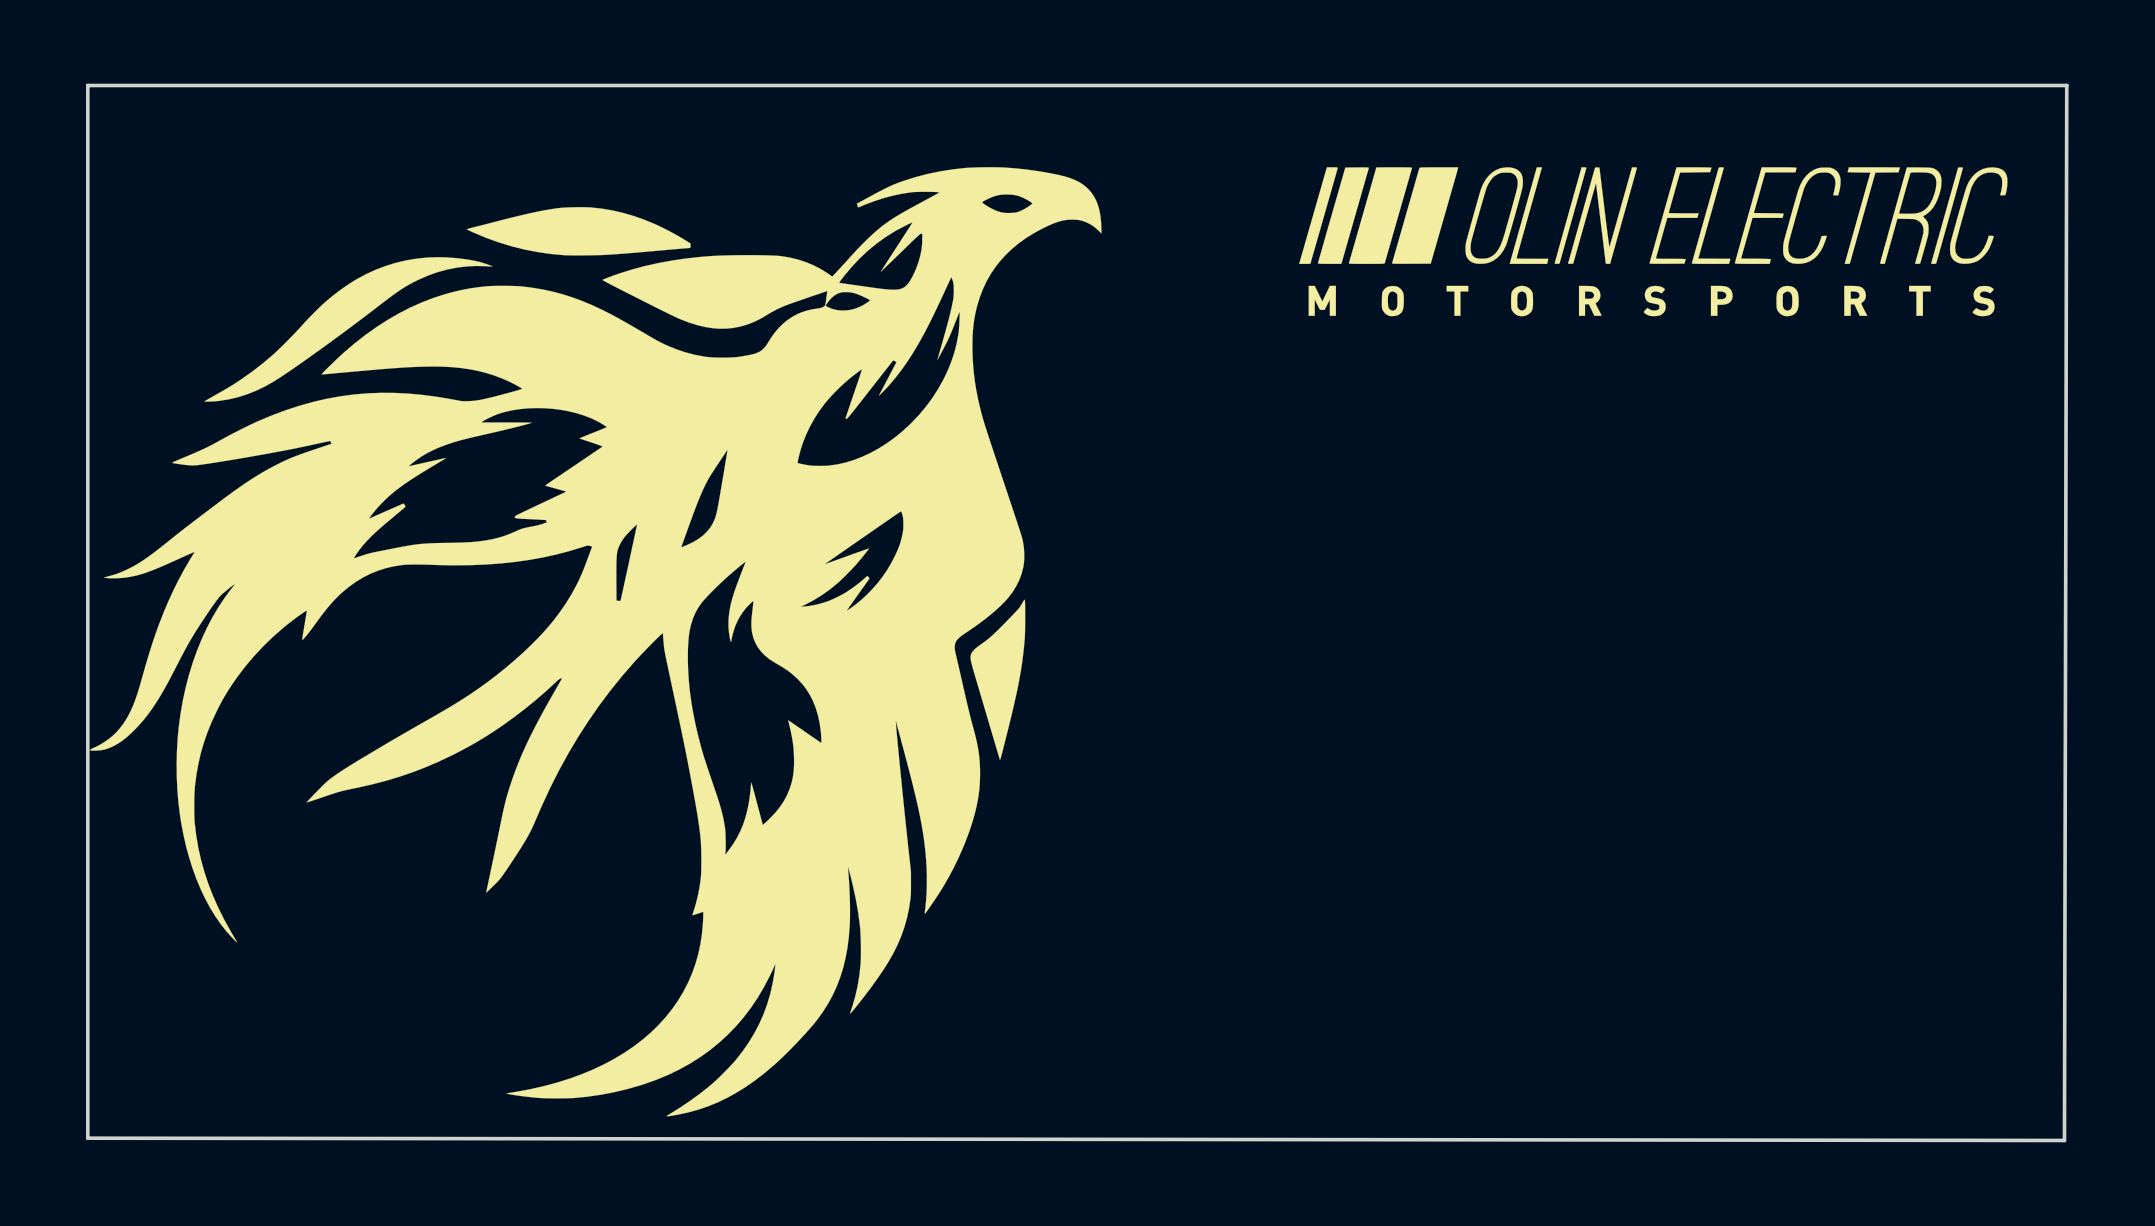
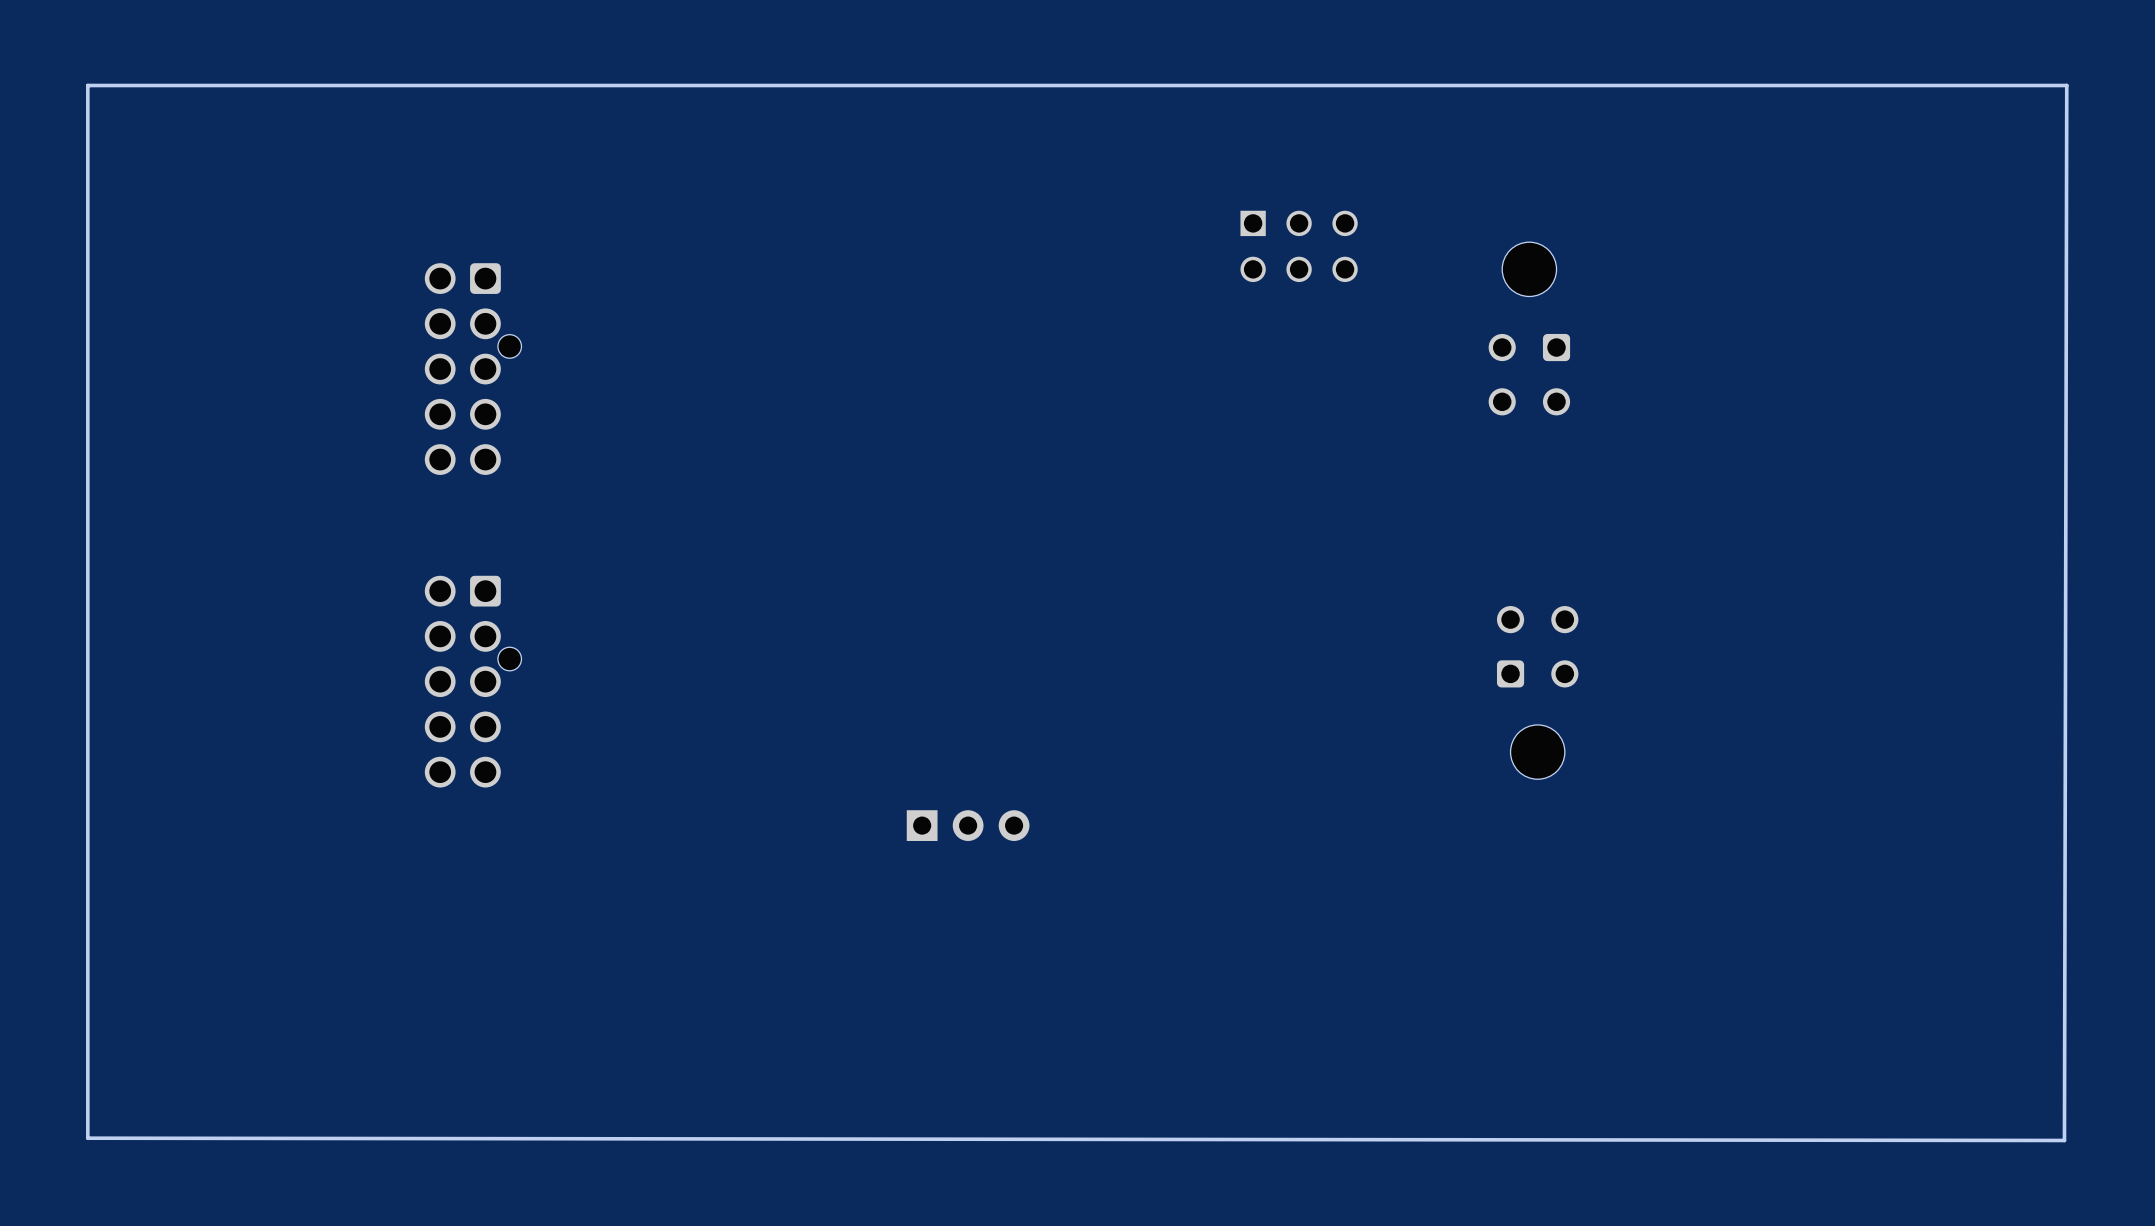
drawing: [90, 167, 1102, 1117] -> none
drawing: [1299, 167, 2008, 317] -> none
part: none -> (1299, 246)
part: none -> (1529, 328)
part: none -> (473, 369)
part: none -> (473, 681)
part: none -> (1537, 692)
part: none -> (968, 825)

